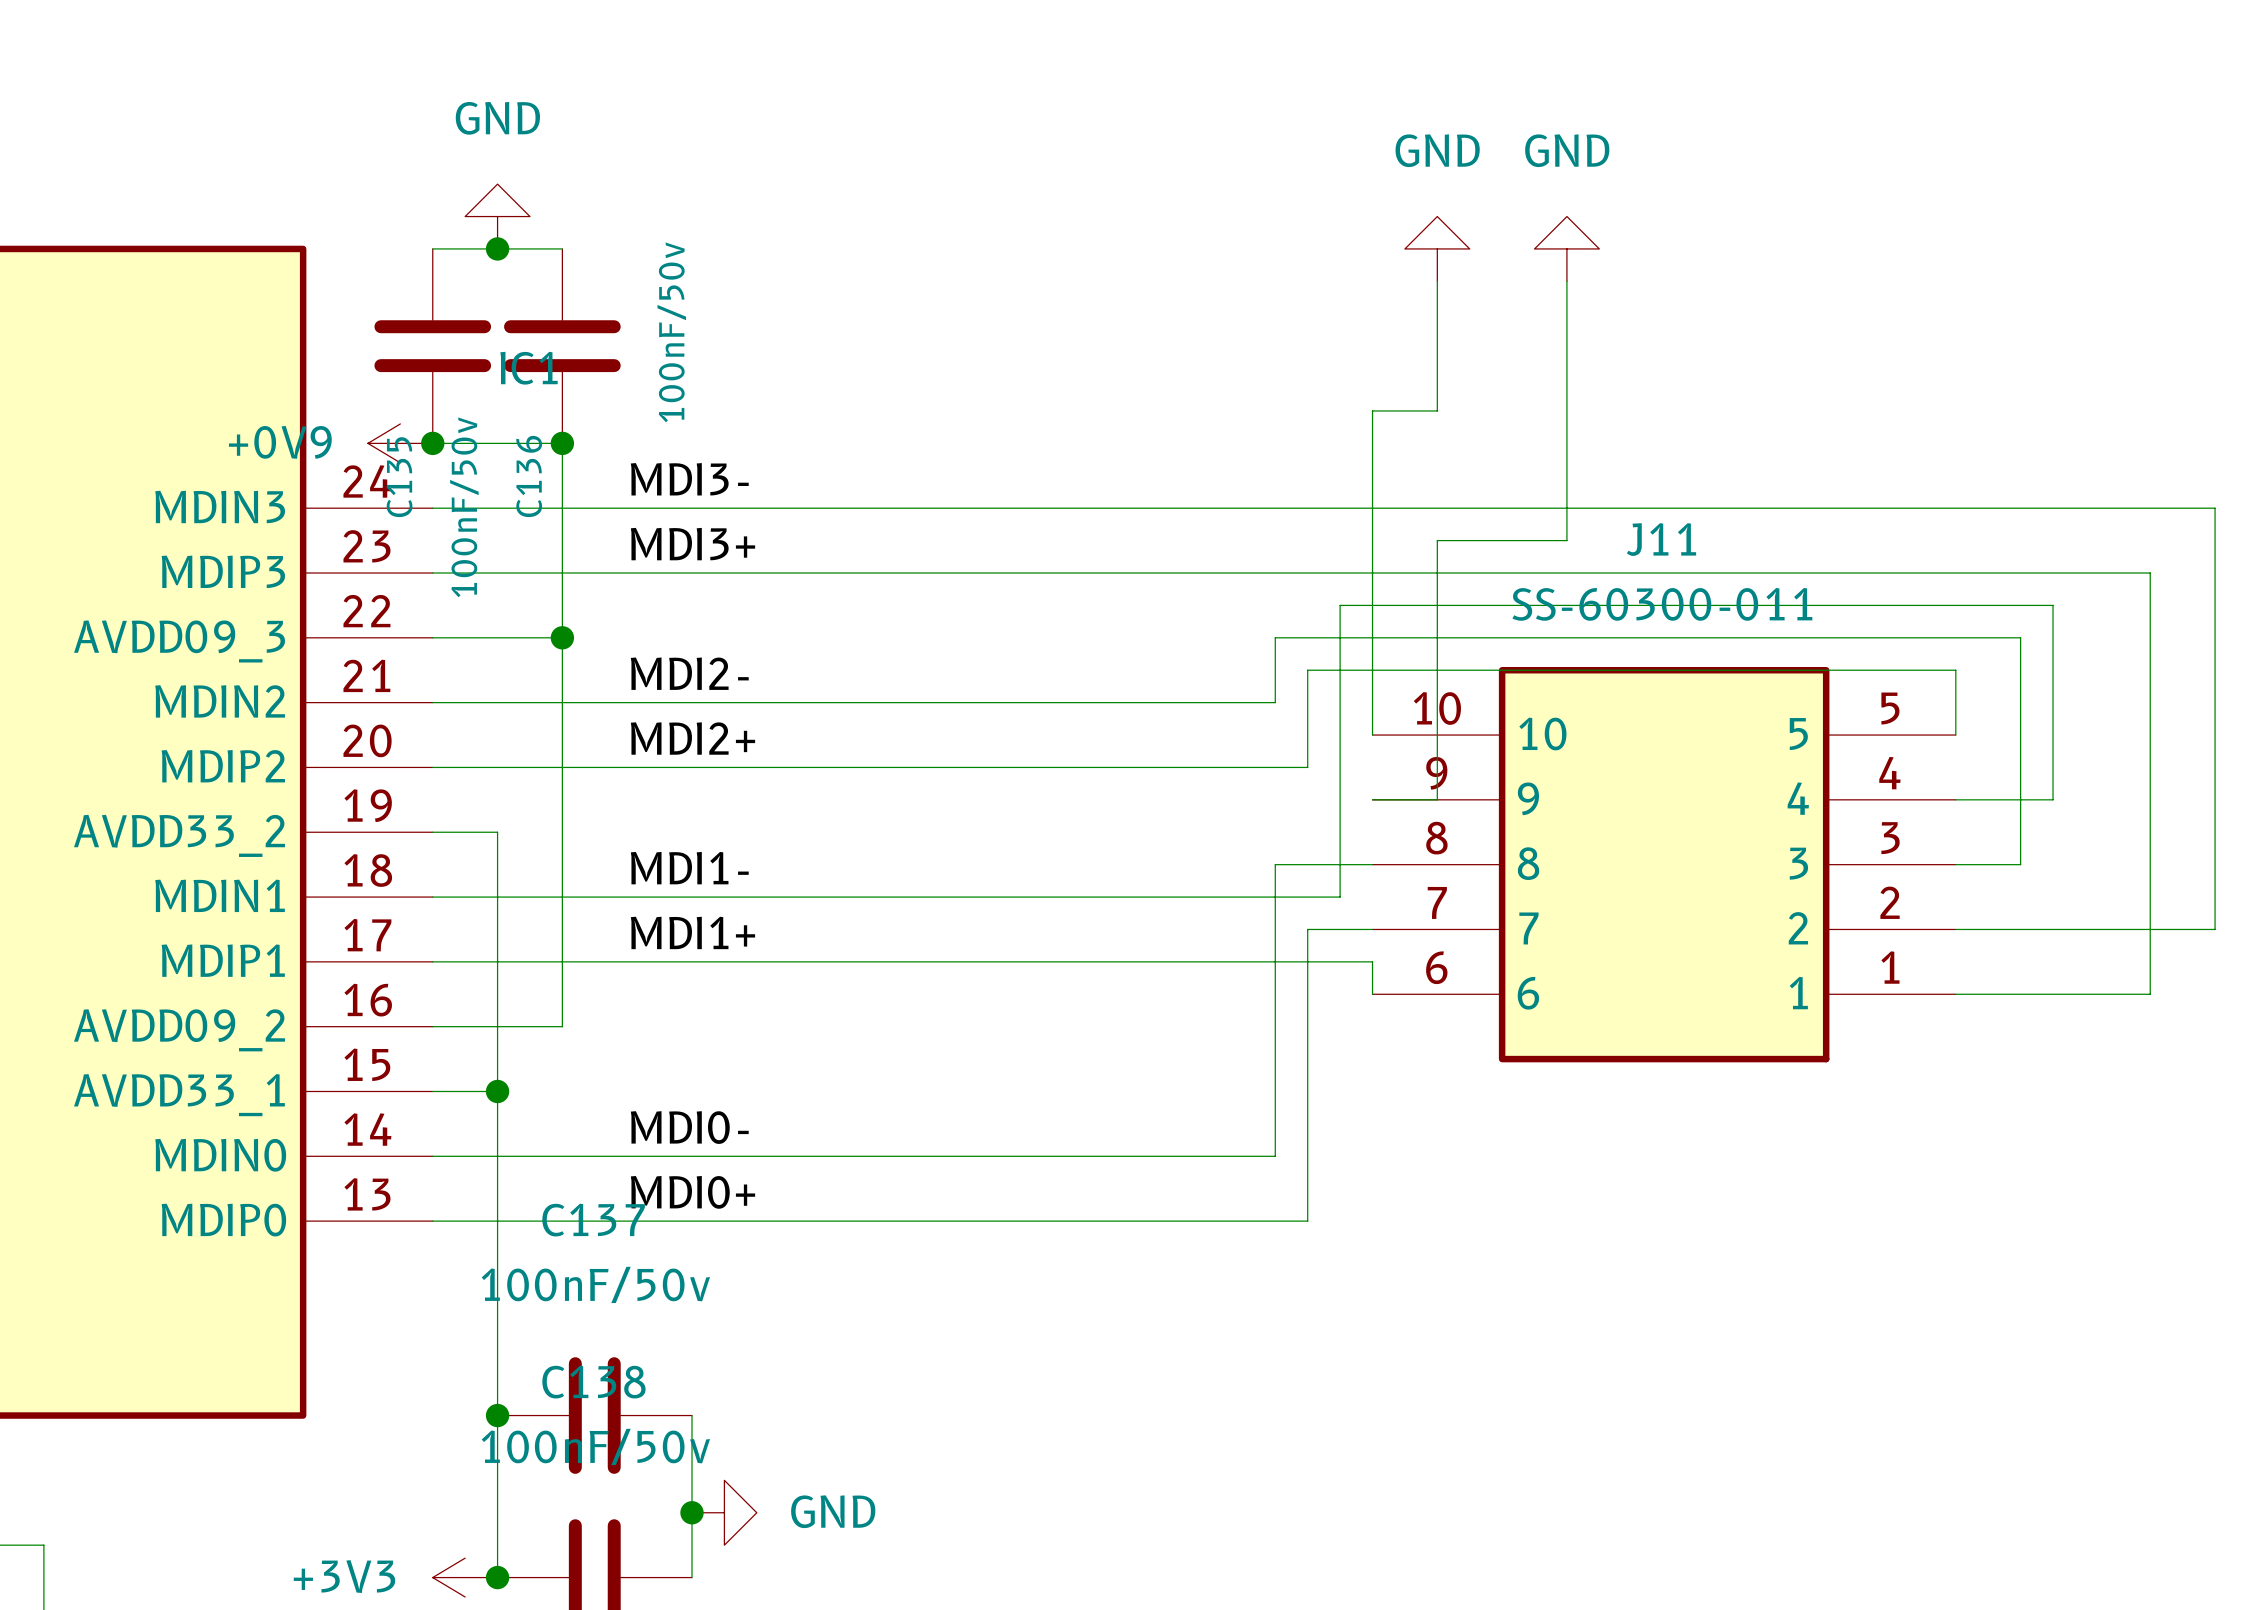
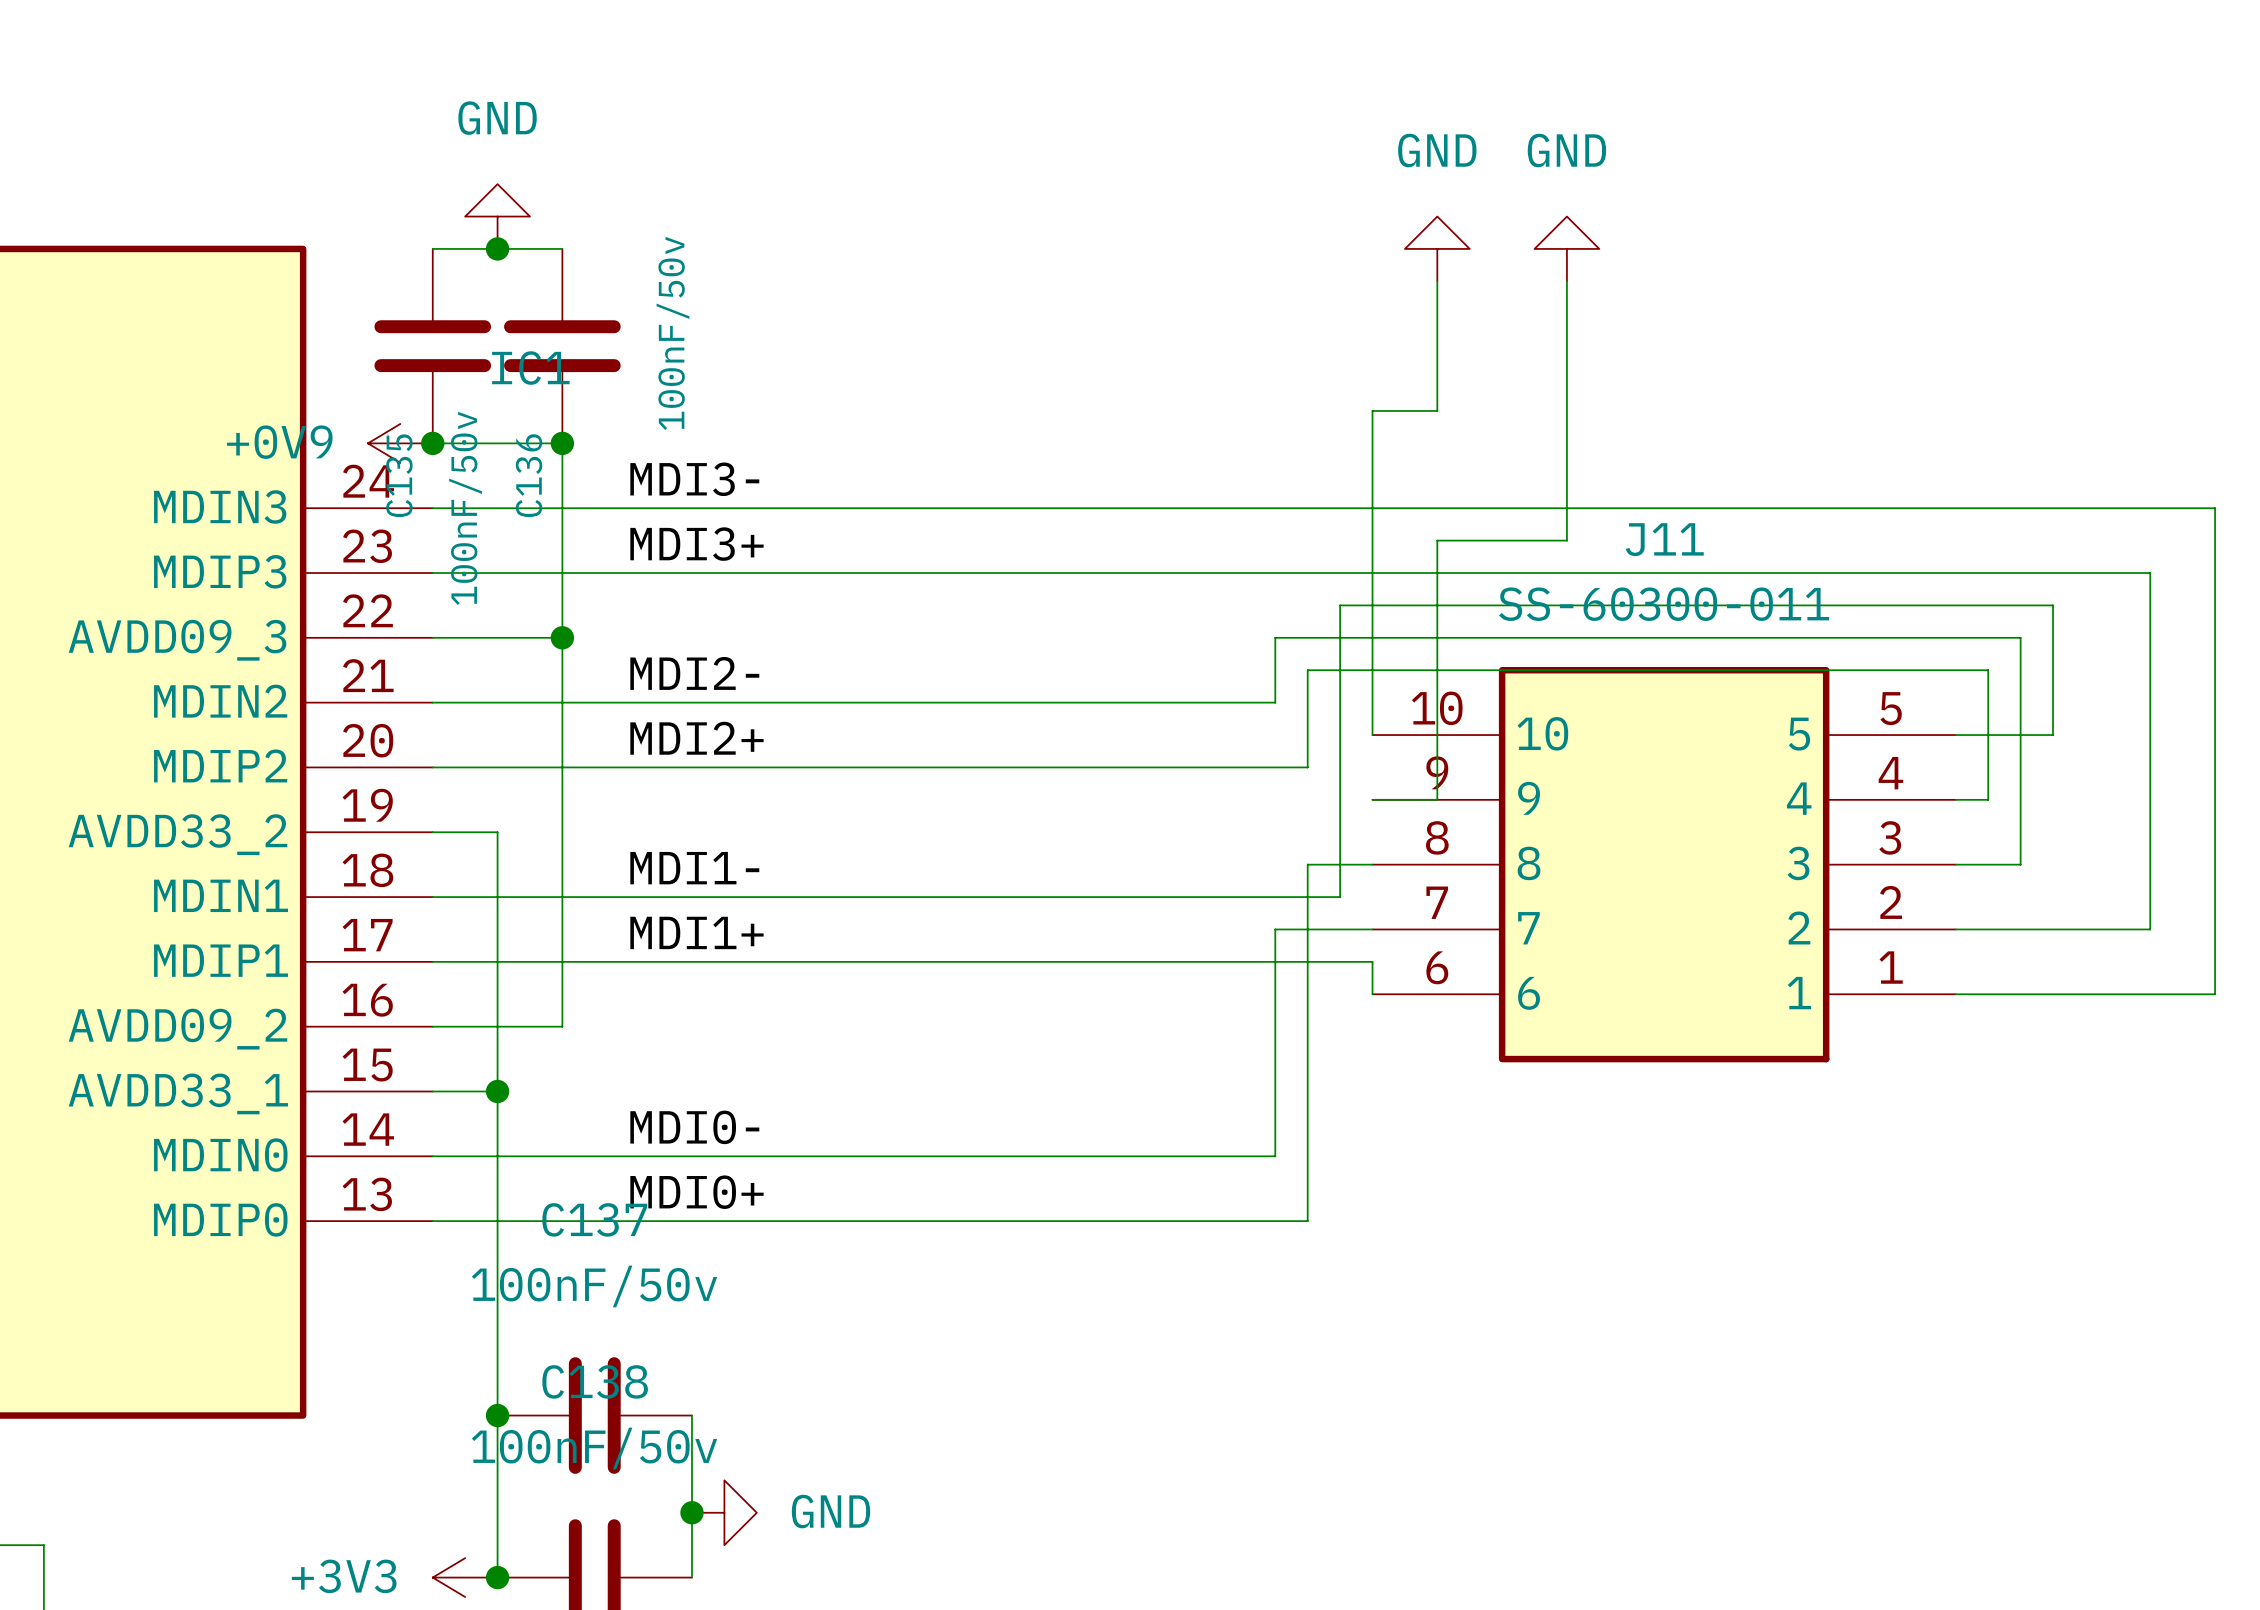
wire: (1955, 670) (1955, 735) -> (1955, 670) (1988, 670) (1988, 799)
wire: (2053, 735) (2053, 799) (1988, 799) -> (2053, 735) (1955, 735)
wire: (1307, 864) (1275, 864) (1275, 929) -> (1307, 864) (1307, 929) (1275, 929)
wire: (2215, 929) (2150, 929) (2150, 994) -> (2215, 929) (2215, 994) (2150, 994)

